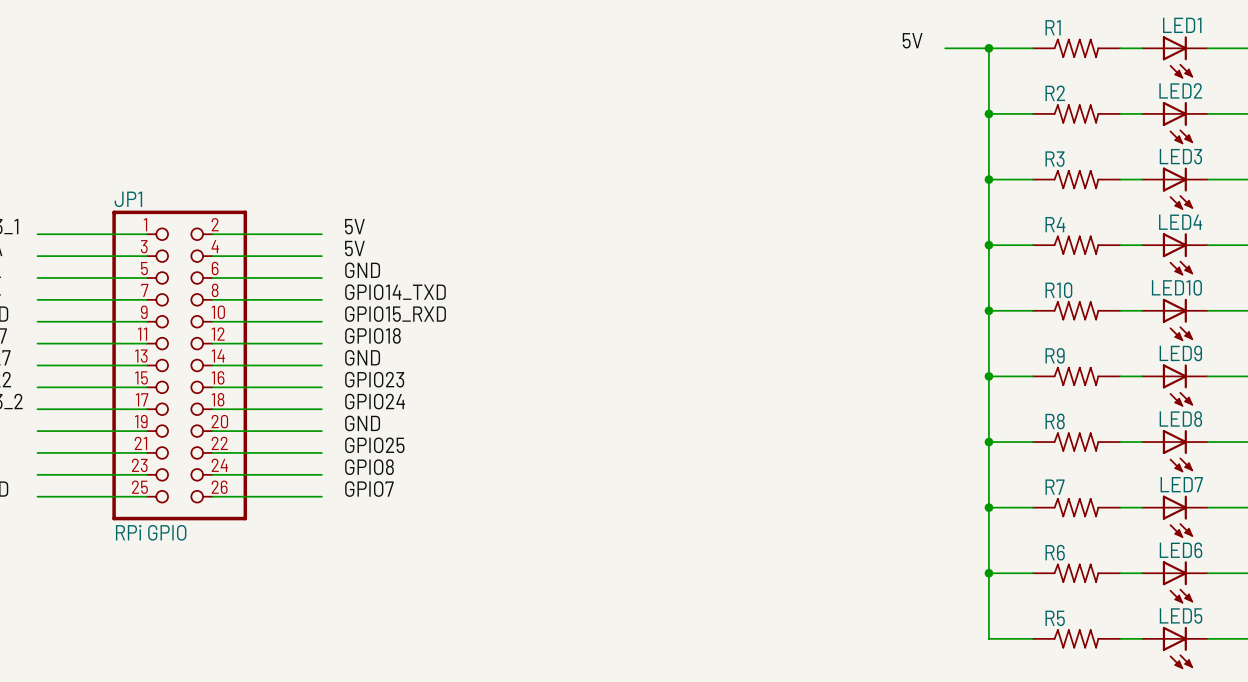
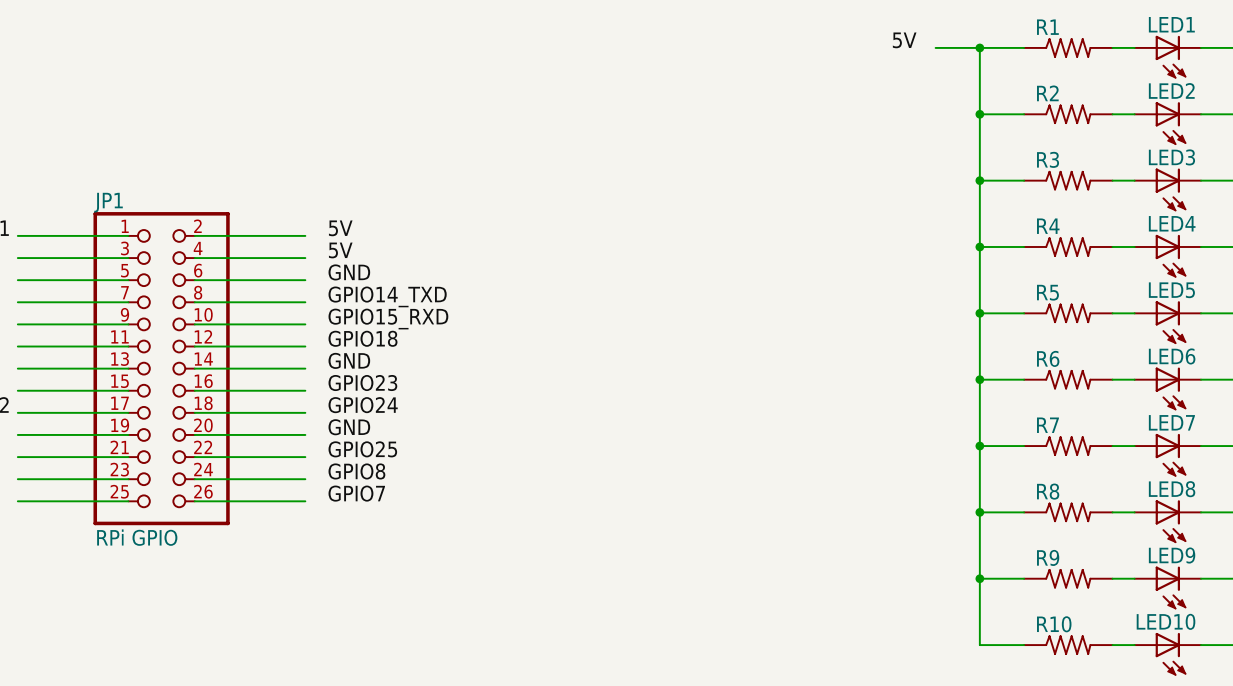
LED10 name: LED10 (1176, 287) -> LED5 (1171, 290)
R10 name: R10 (1058, 290) -> R5 (1047, 292)
LED9 name: LED9 (1180, 353) -> LED6 (1172, 356)
R9 name: R9 (1055, 355) -> R6 (1048, 358)
LED8 name: LED8 (1180, 419) -> LED7 (1171, 422)
R8 name: R8 (1055, 421) -> R7 (1047, 425)
LED7 name: LED7 (1181, 484) -> LED8 (1172, 489)
R7 name: R7 (1055, 487) -> R8 (1048, 491)
LED6 name: LED6 (1181, 550) -> LED9 (1172, 555)
R6 name: R6 (1055, 552) -> R9 (1048, 557)
LED5 name: LED5 (1181, 615) -> LED10 (1166, 621)
R5 name: R5 (1055, 618) -> R10 (1054, 624)

